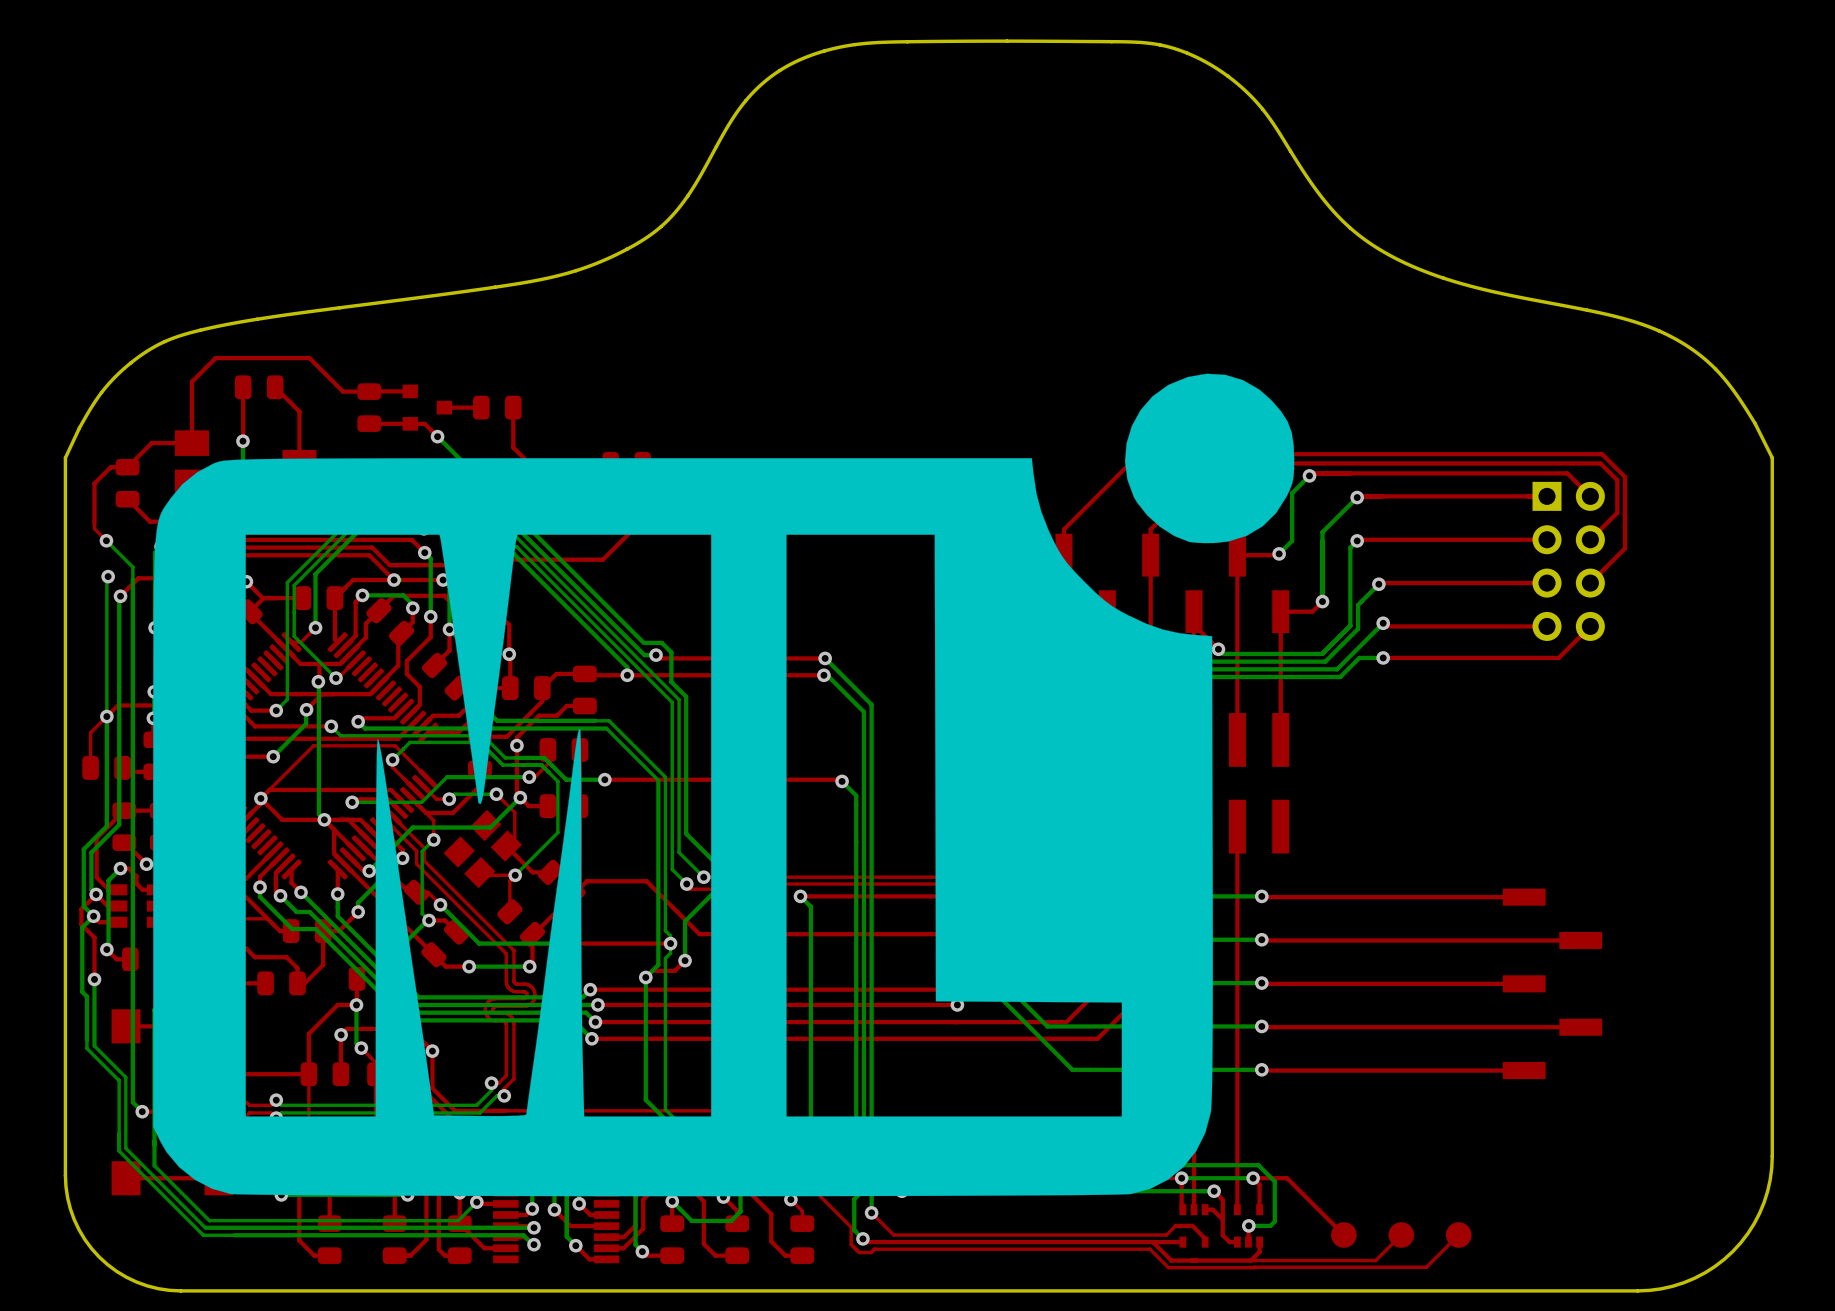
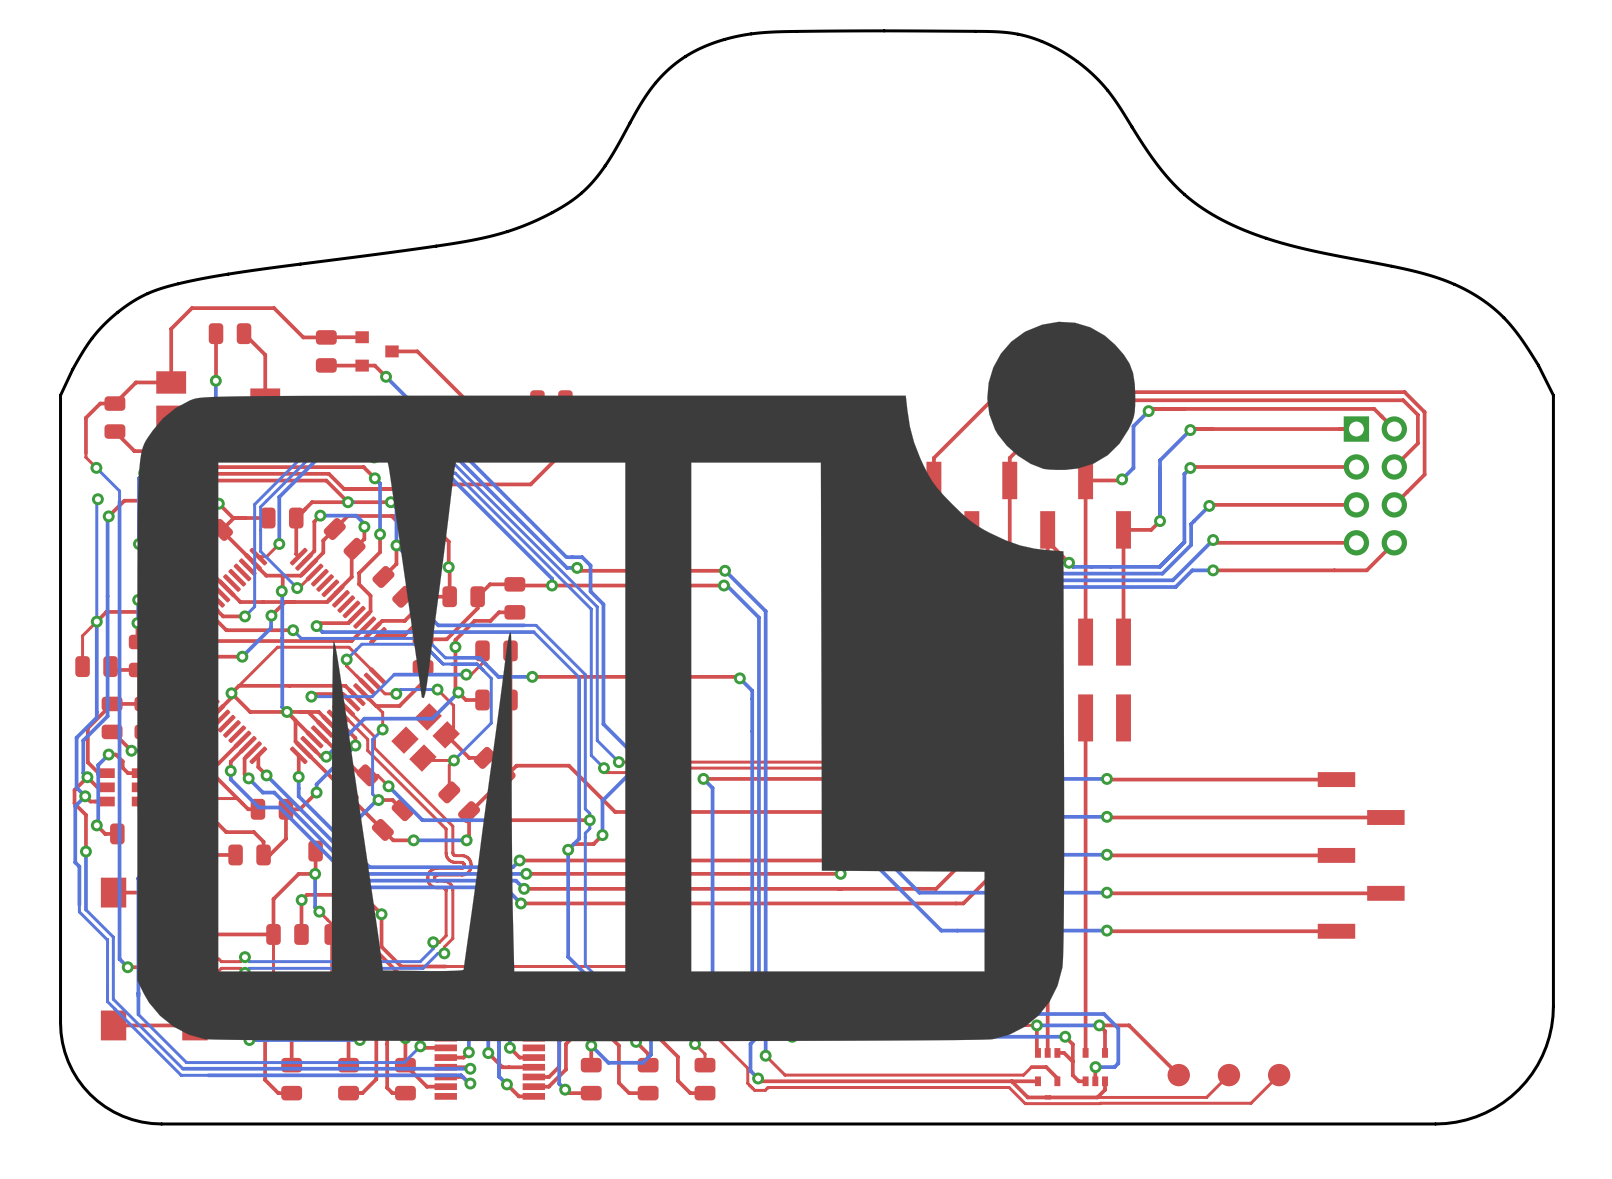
part: (497, 407) -> none
top track: (513, 407) (513, 447) -> (417, 351) (452, 386)

